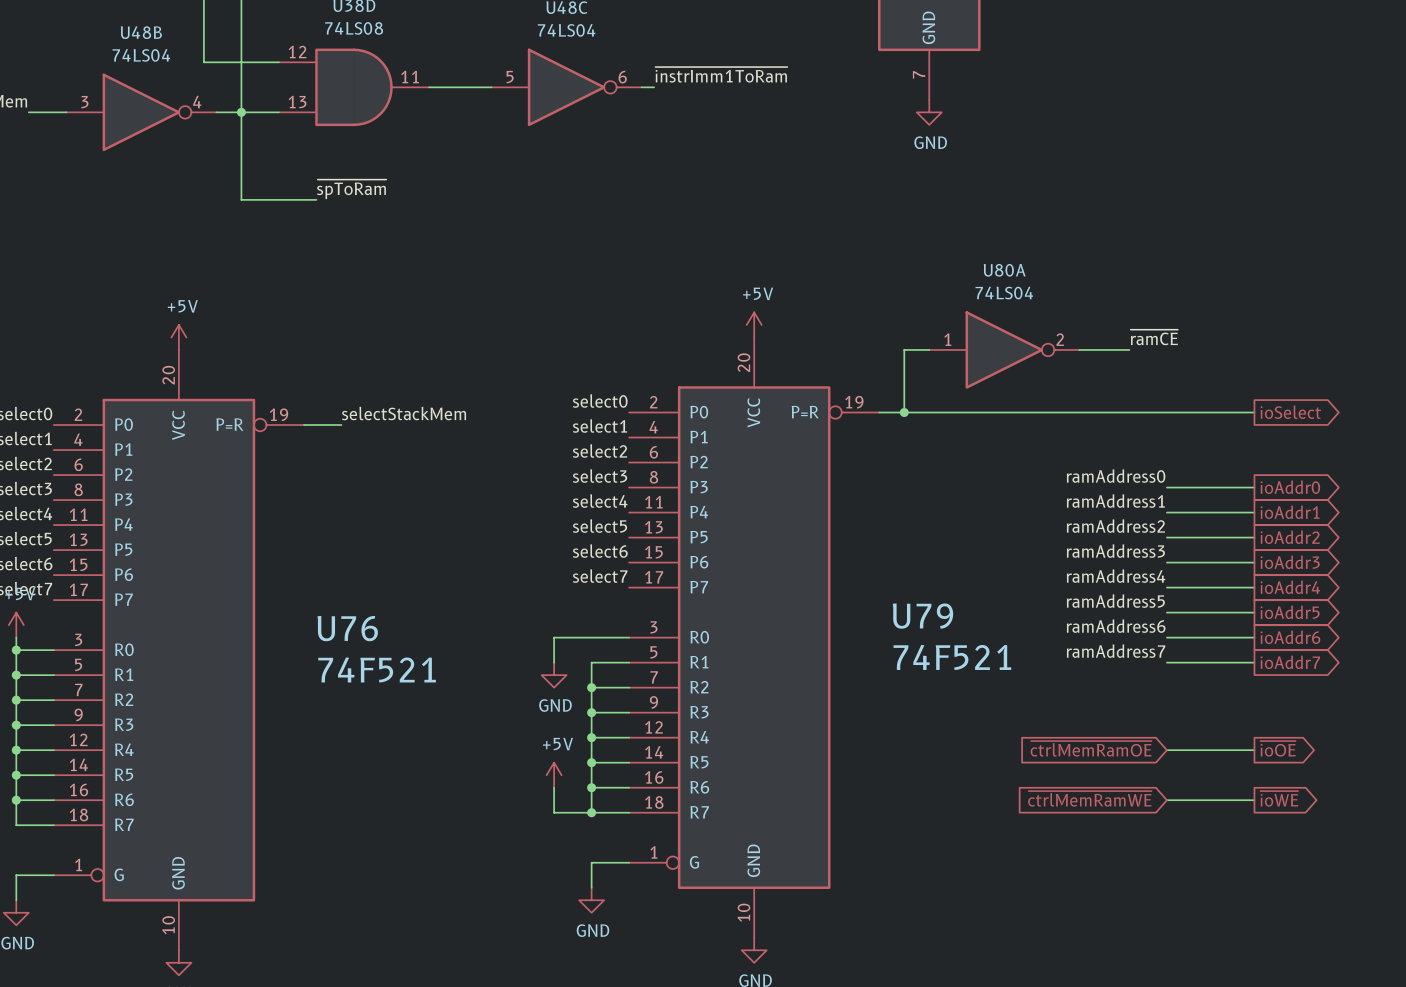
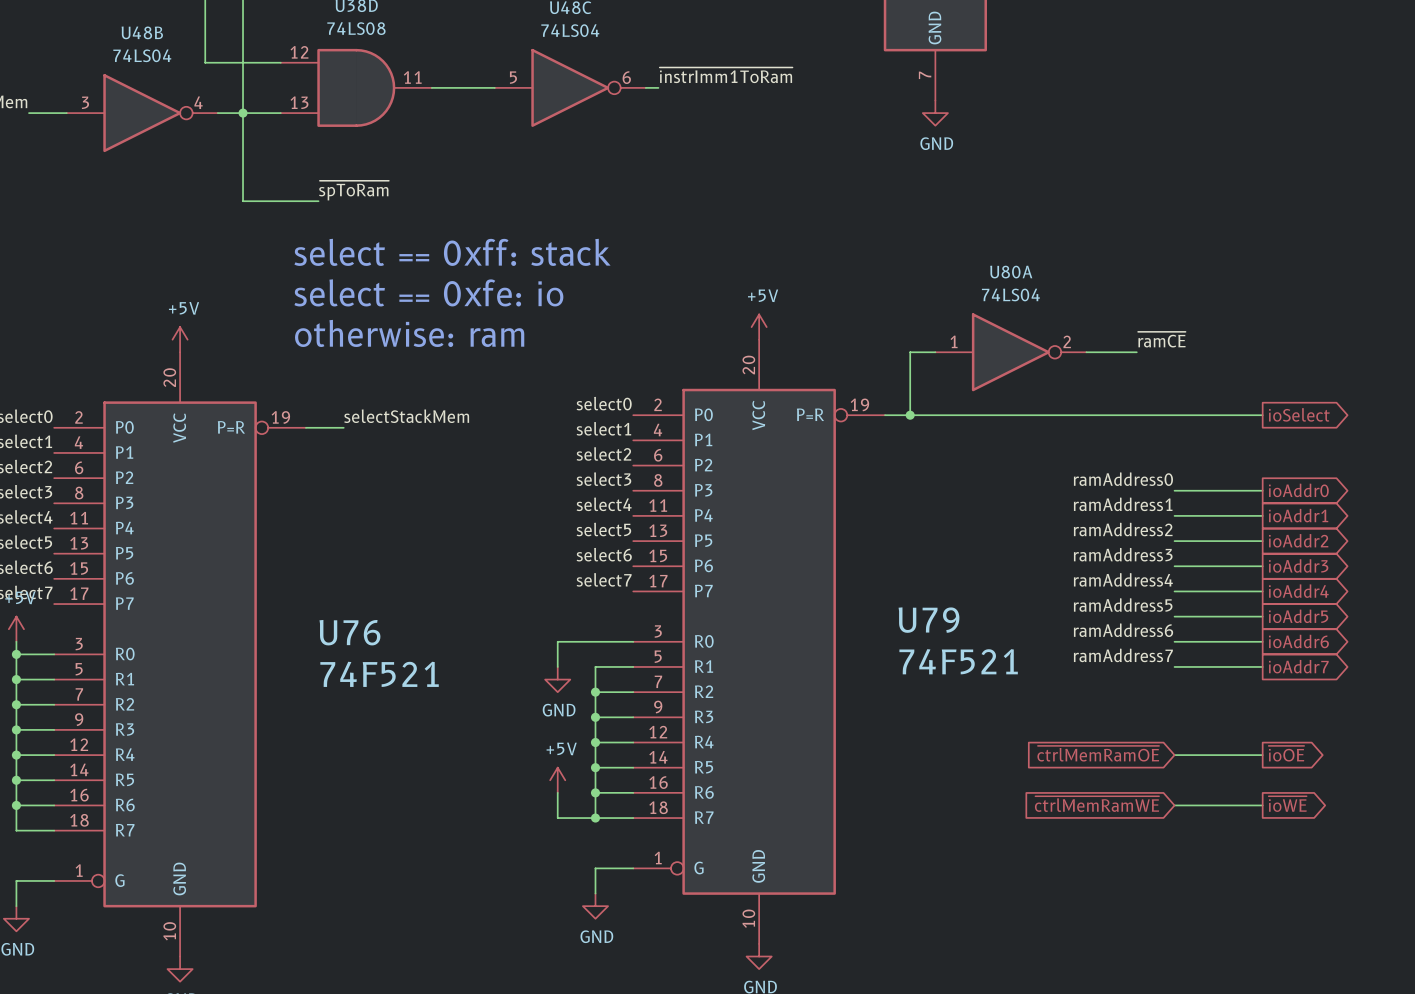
text: none -> select == 0xff: stack (452, 252)
text: none -> select == 0xfe: io (428, 292)
text: none -> otherwise: ram (409, 333)

